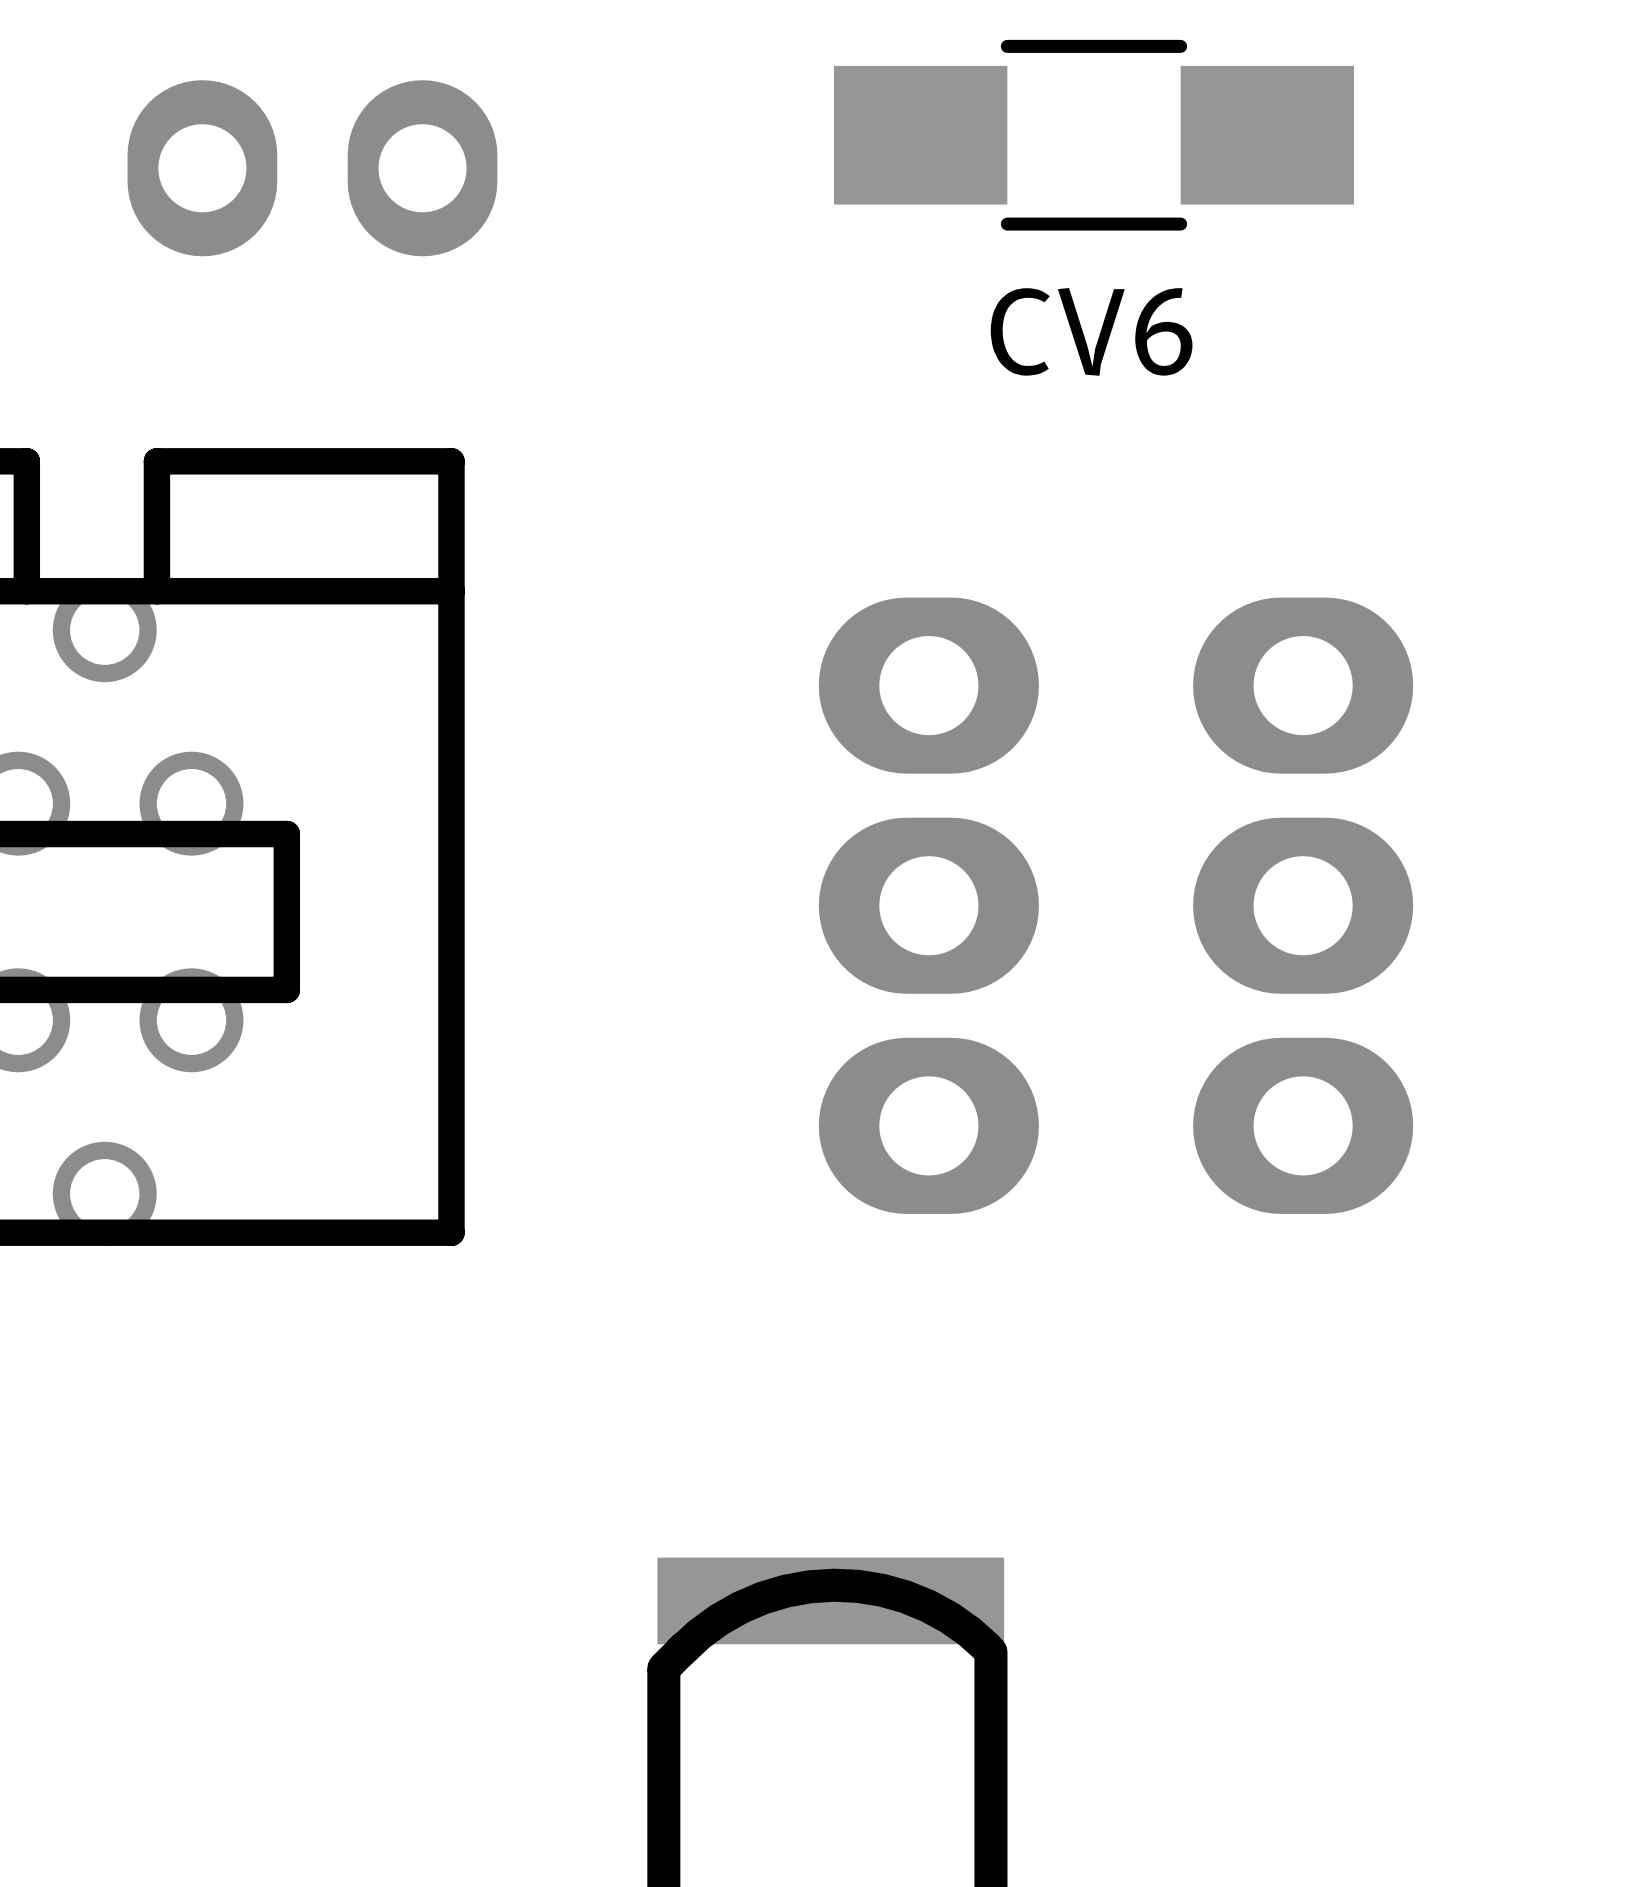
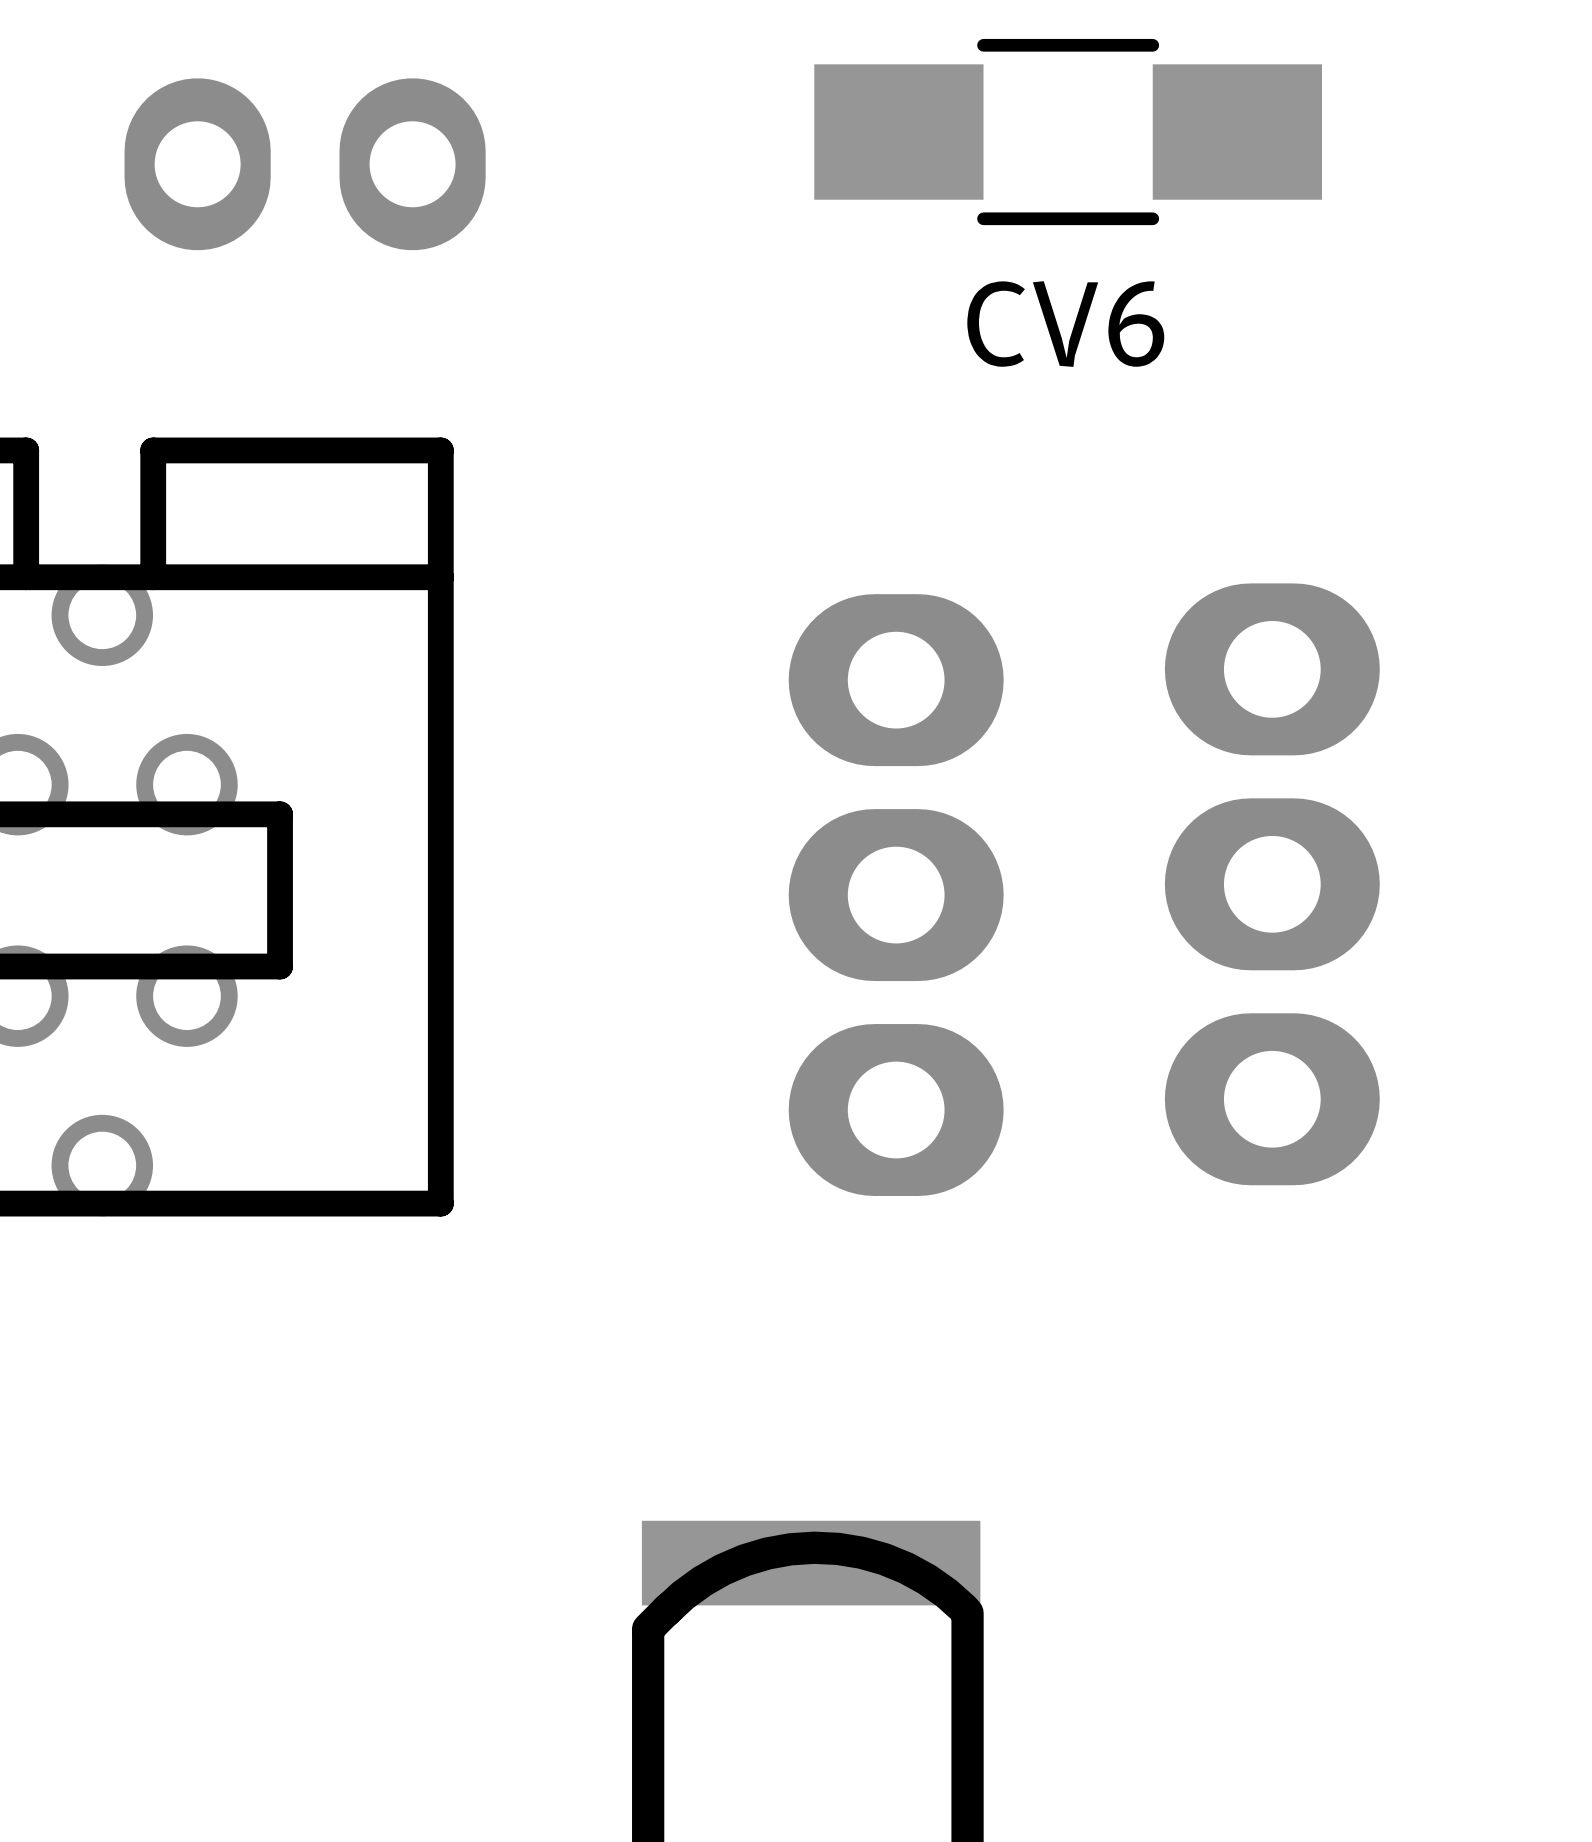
part position: (928, 905) -> (896, 895)

